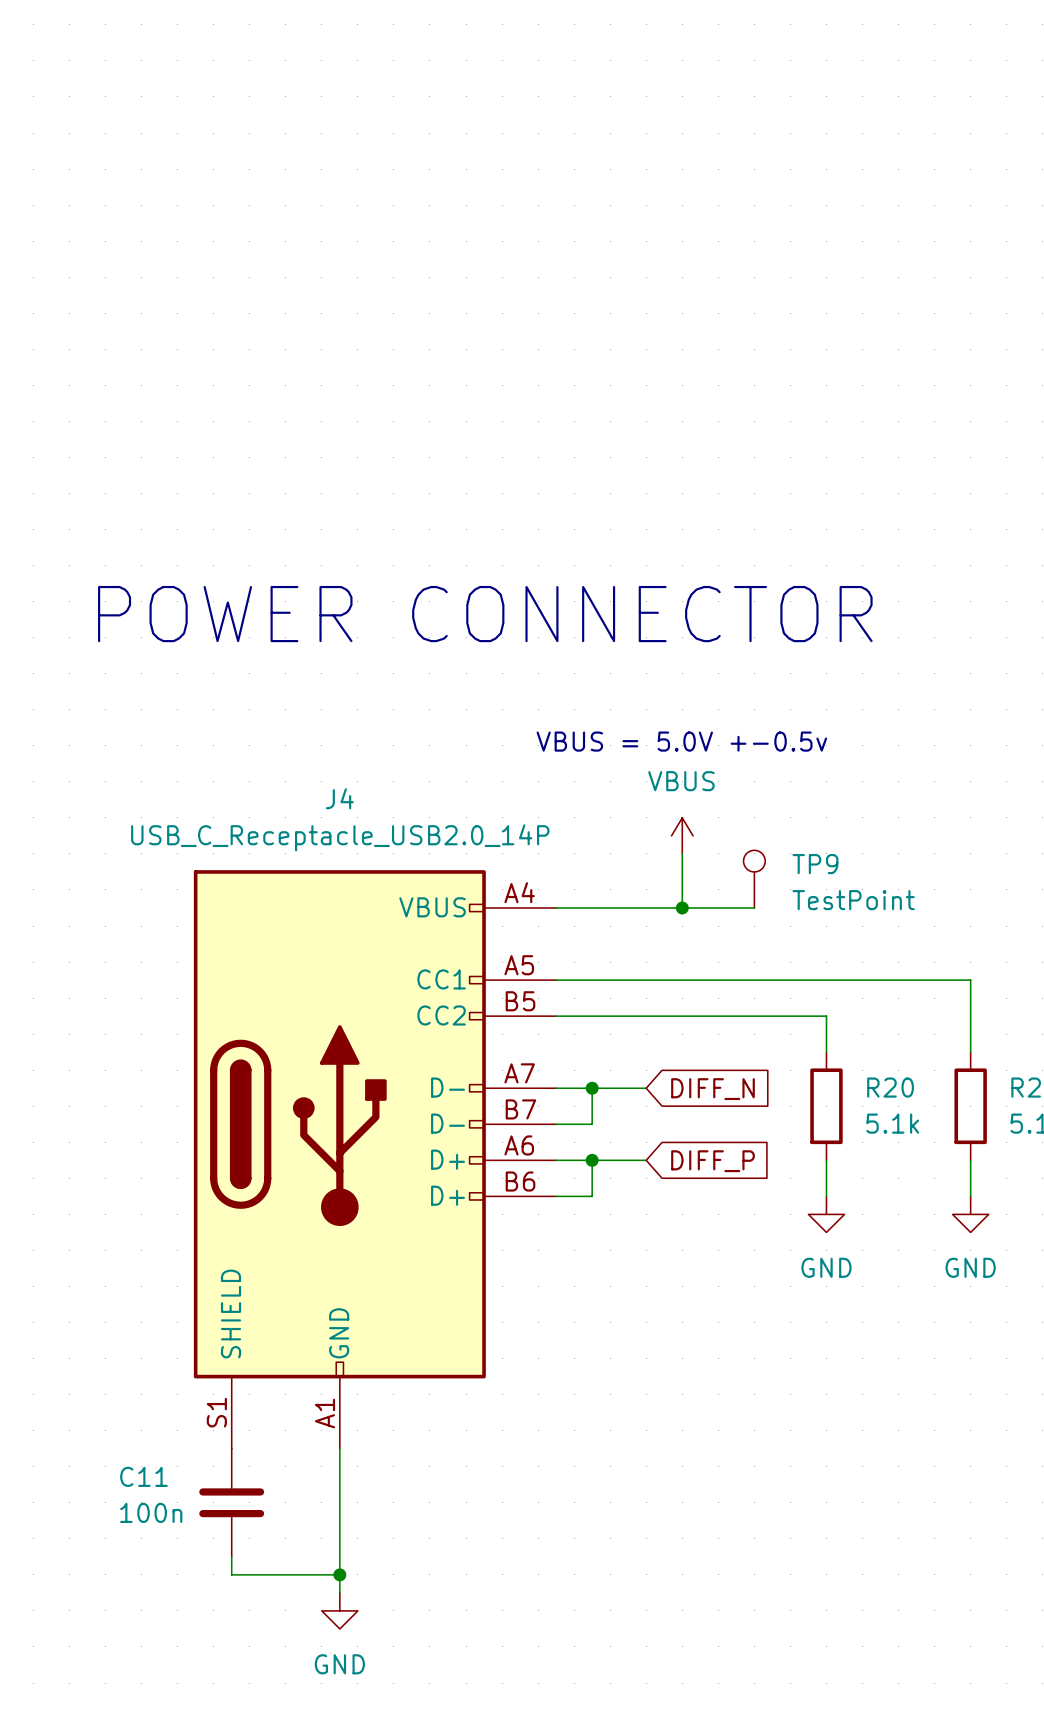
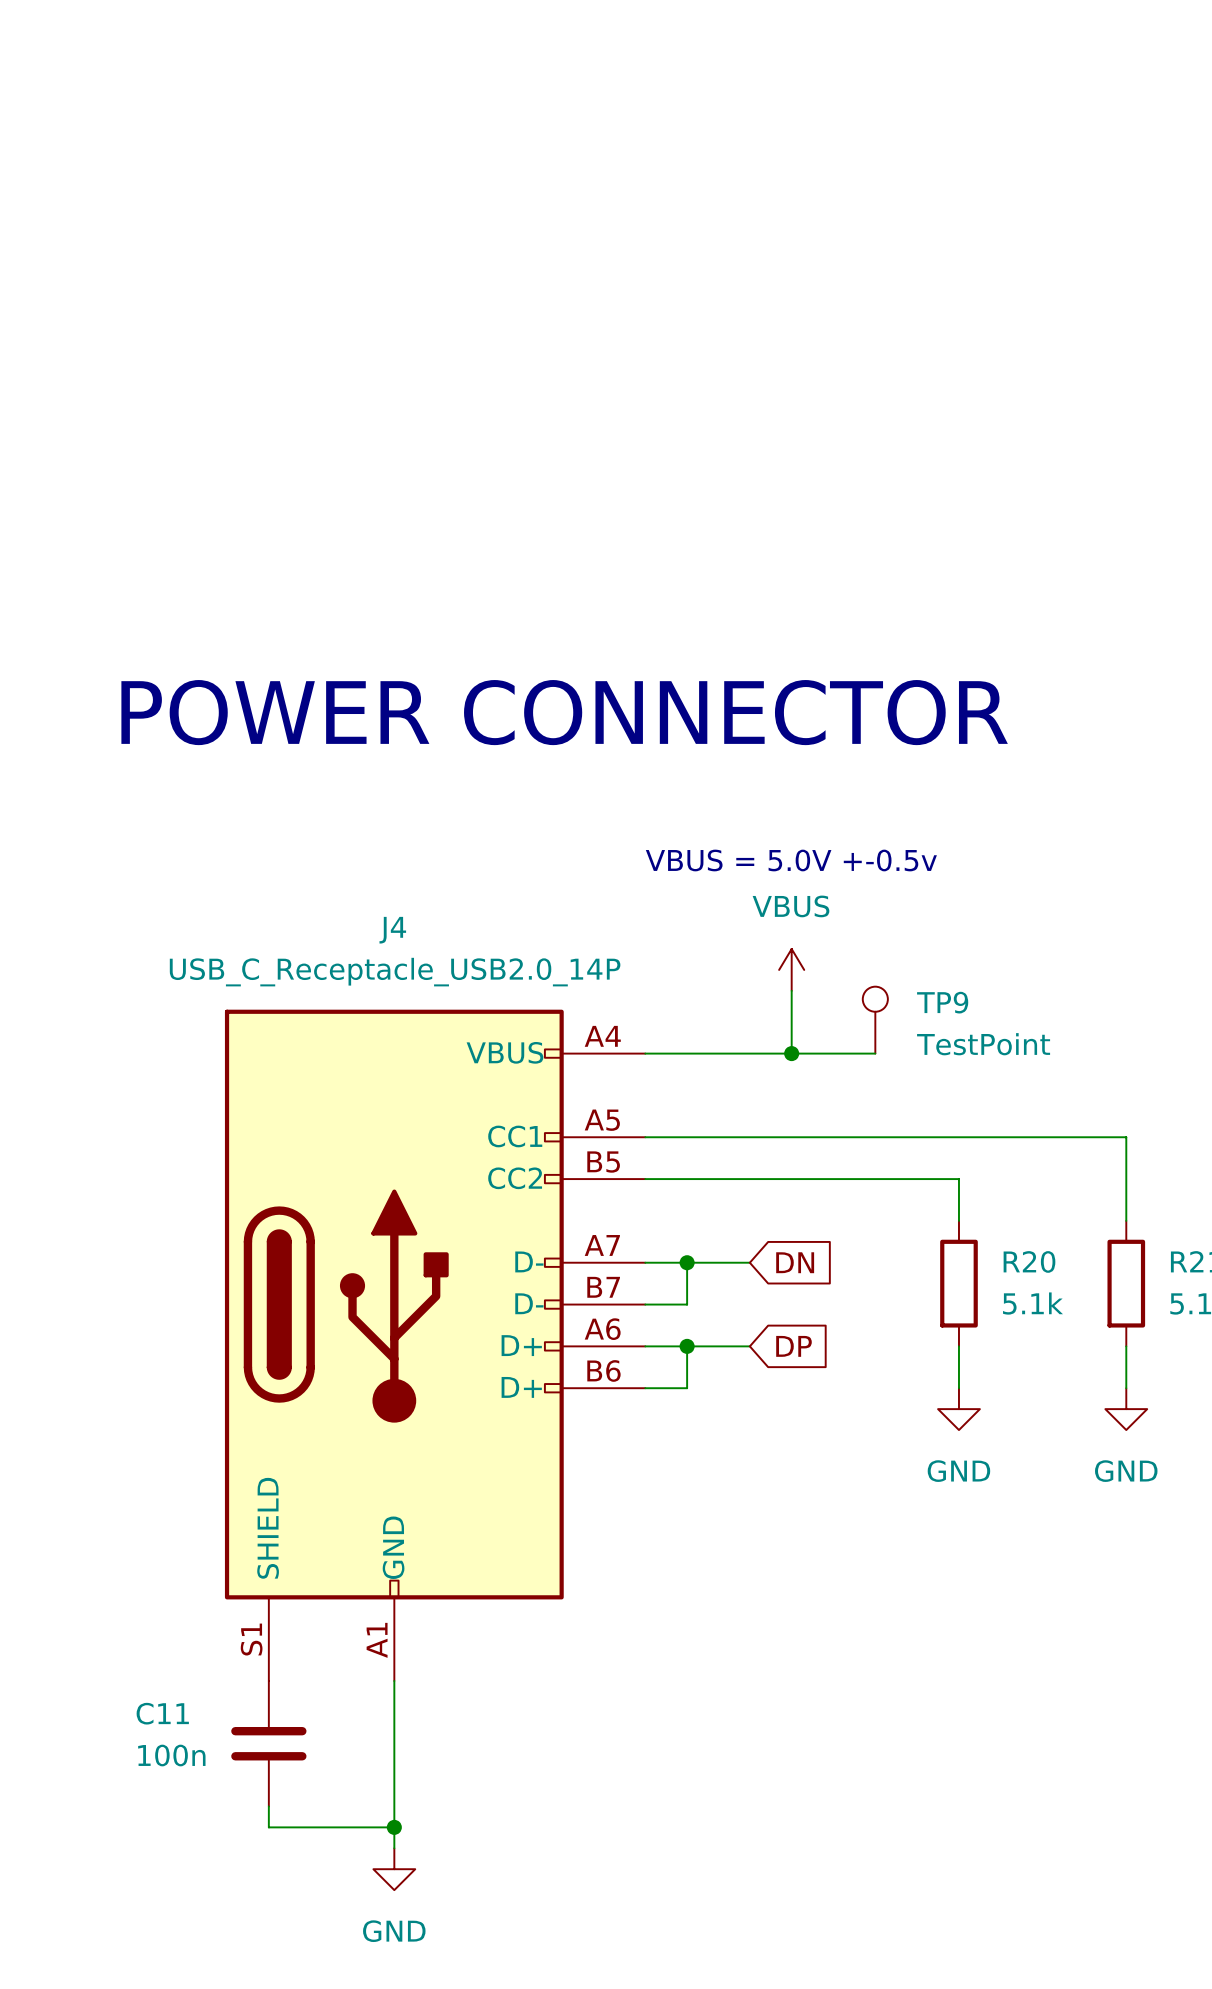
global label: DIFF_N (712, 1089) -> DN (795, 1262)
global label: DIFF_P (712, 1161) -> DP (793, 1346)

